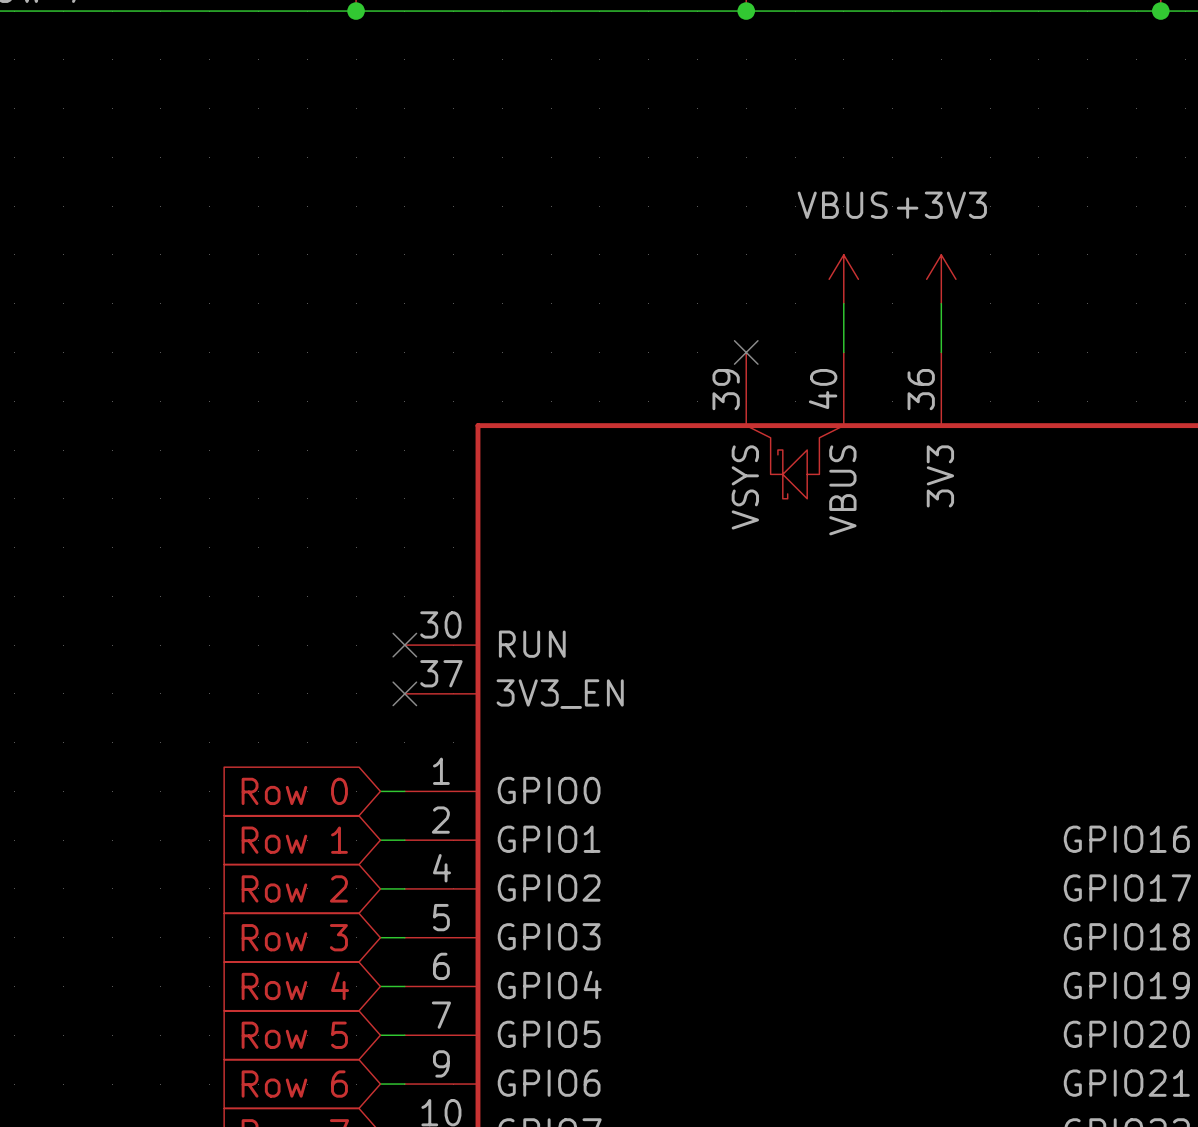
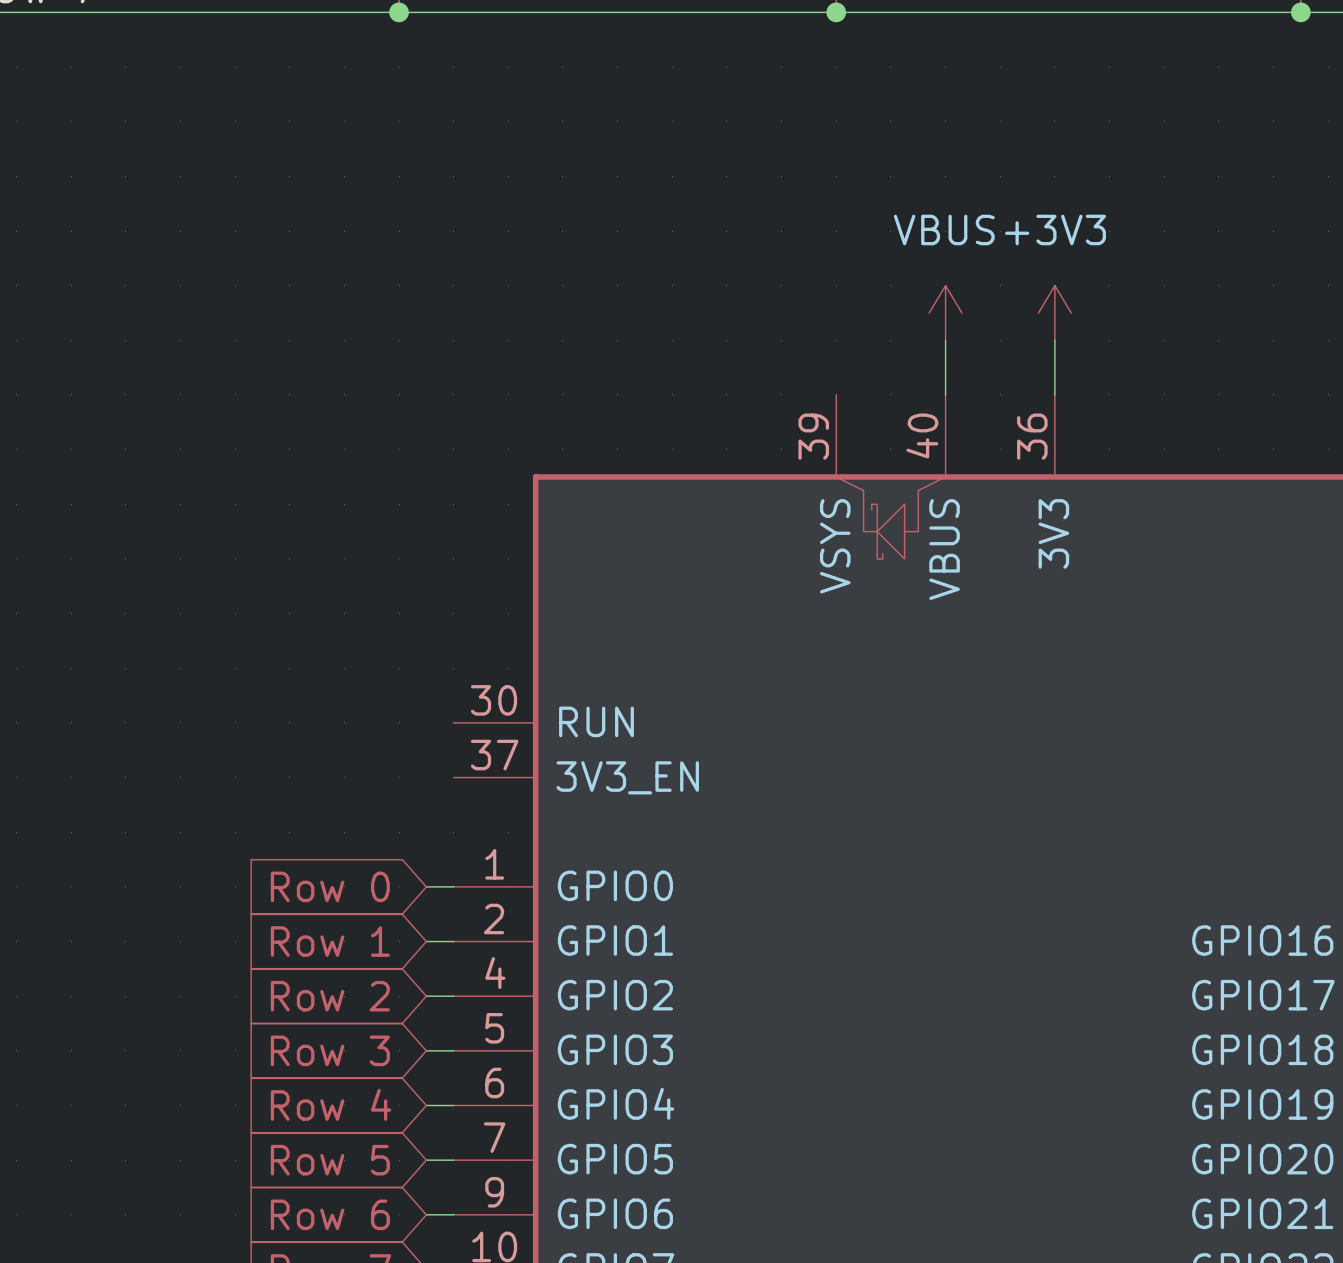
no-connect mark: (746, 352) -> none
no-connect mark: (404, 645) -> none
no-connect mark: (404, 693) -> none

